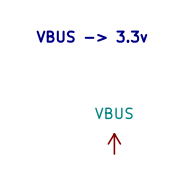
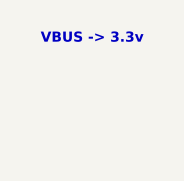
power symbol: VBUS (114, 144) -> none

